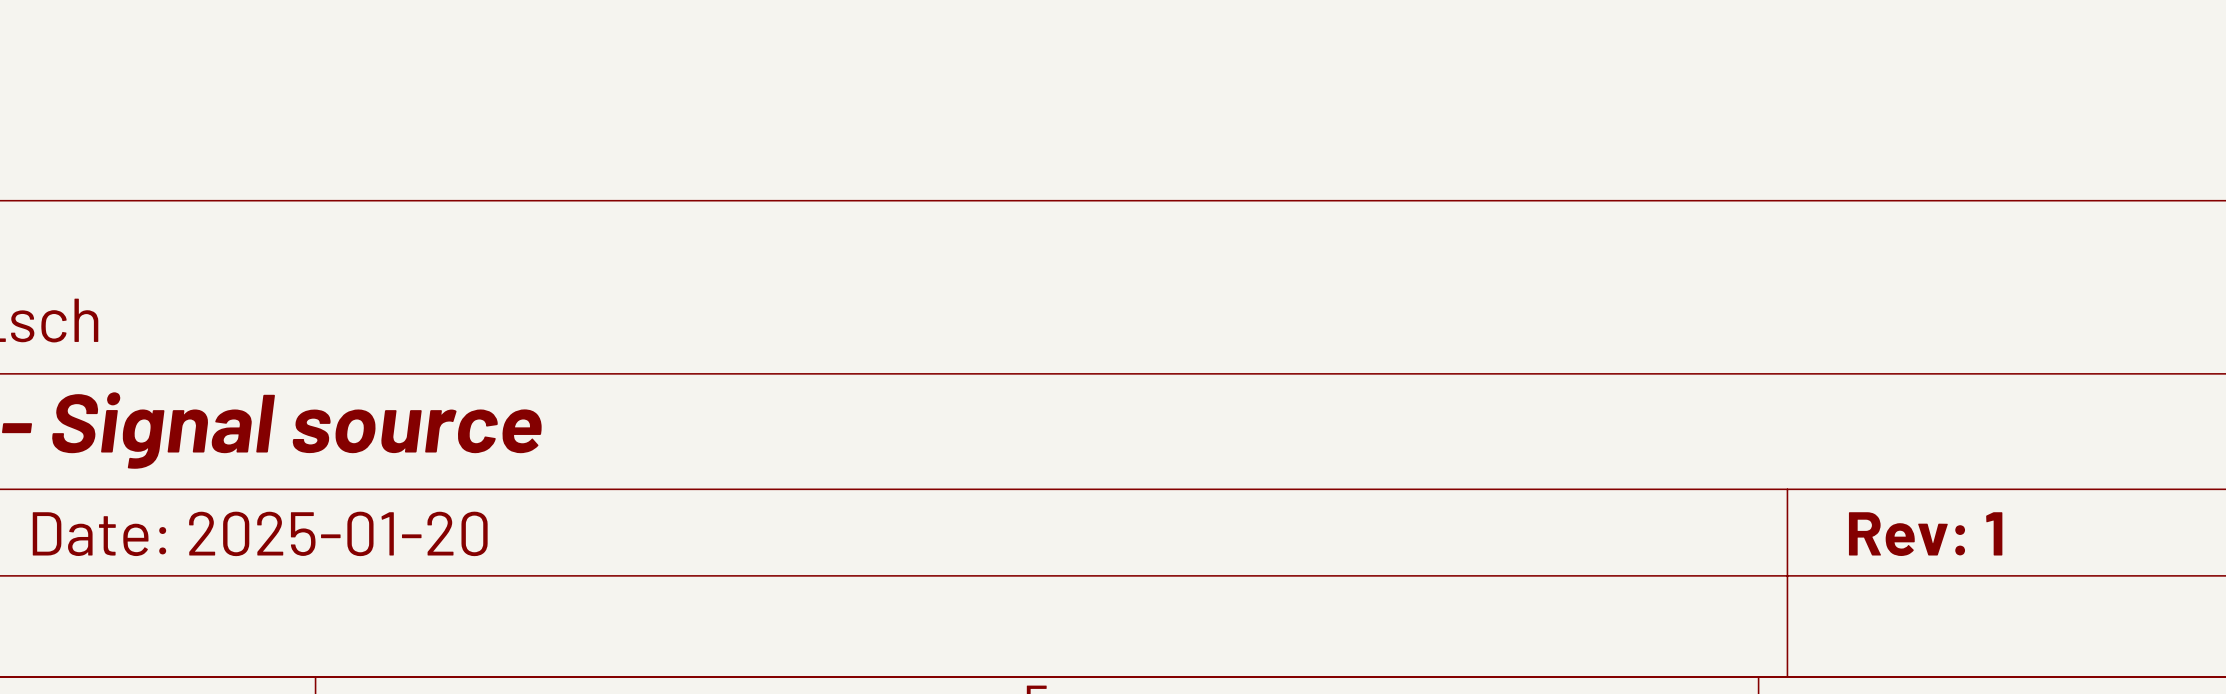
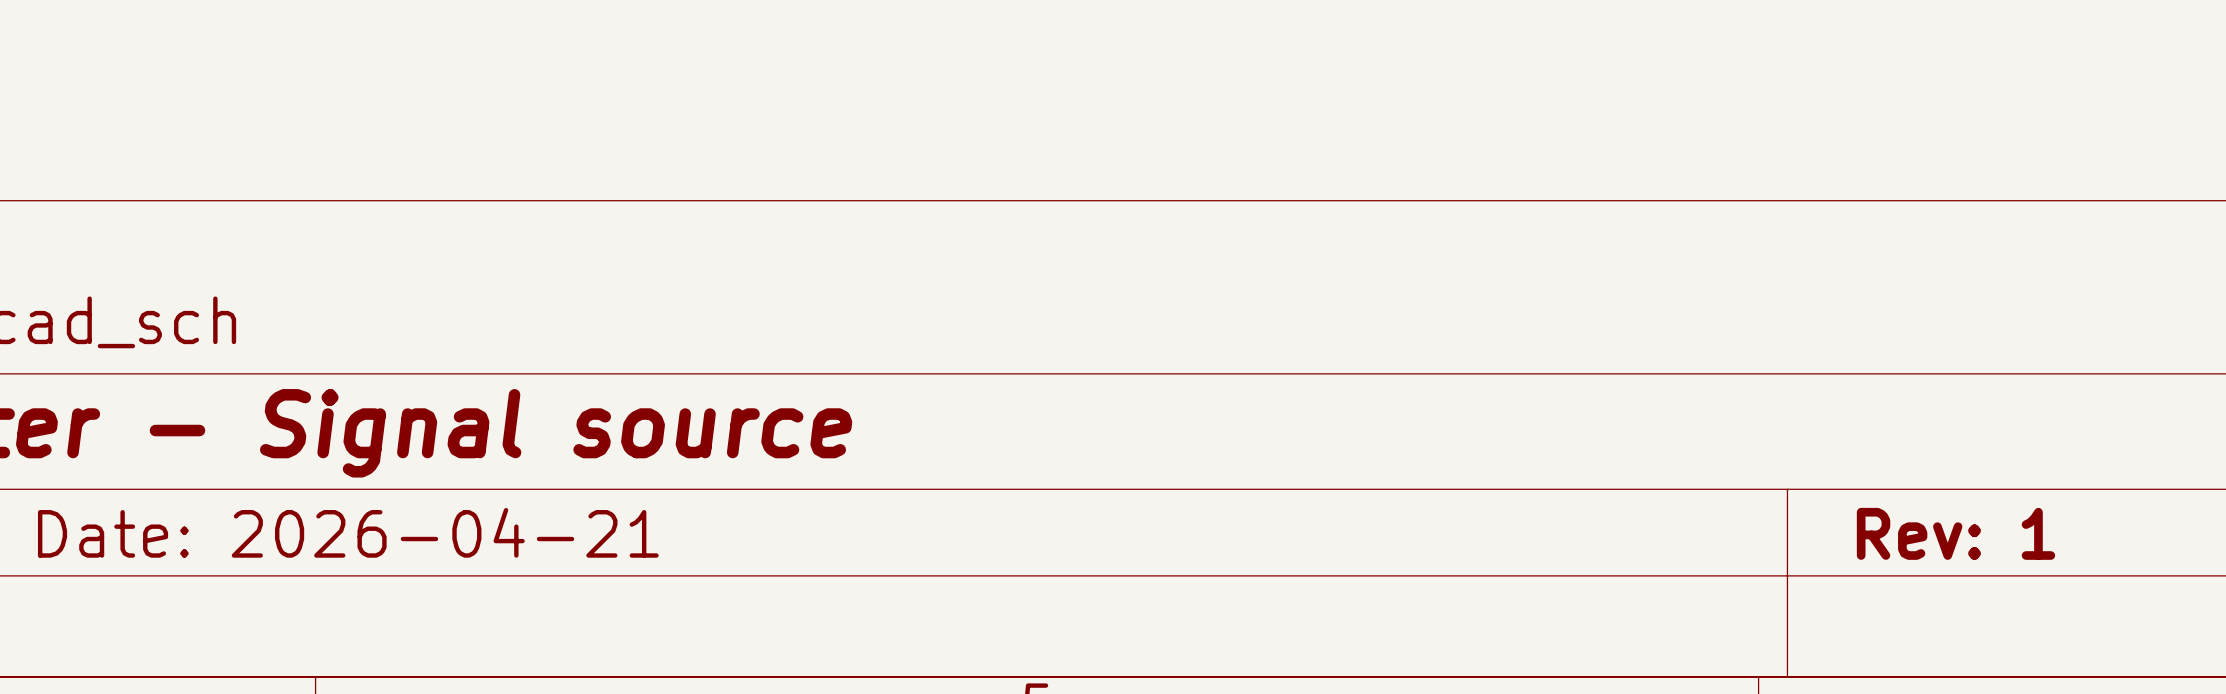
title block: Date: 2025-01-20 (260, 533) -> Date: 2026-04-21 (348, 532)

